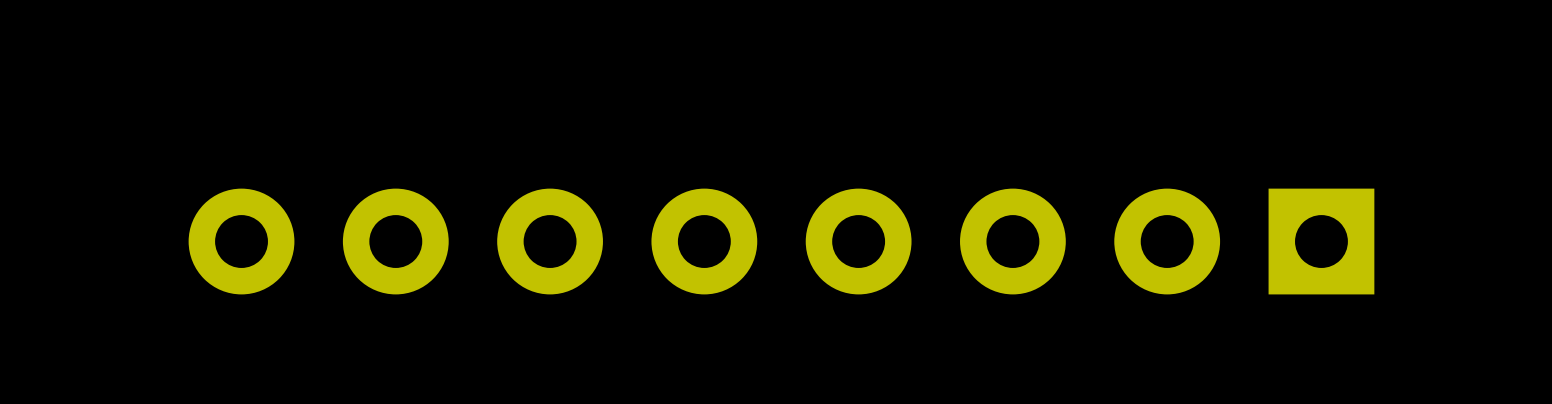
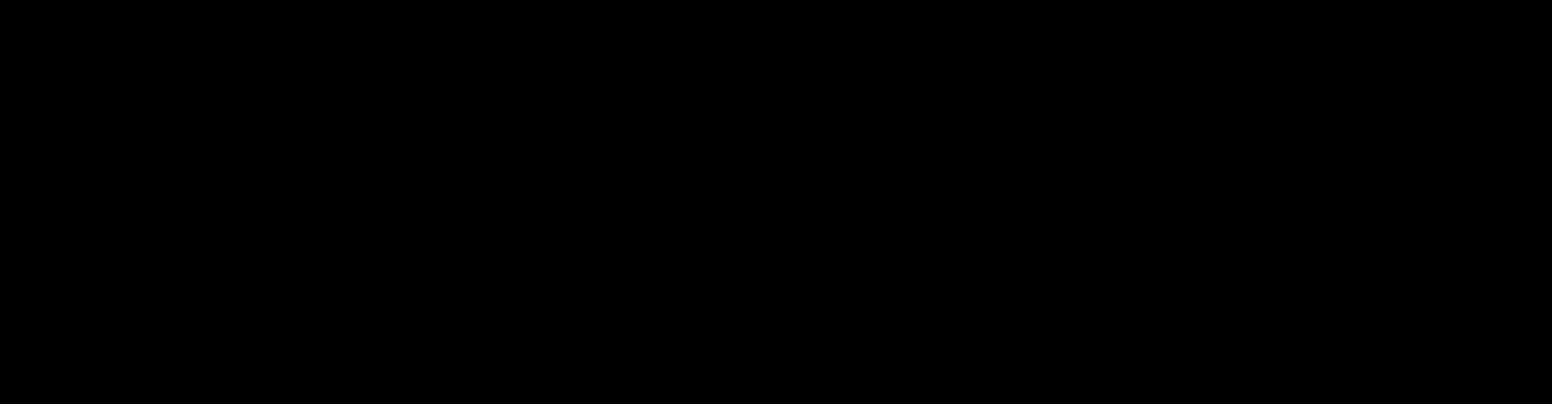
part: (781, 241) -> none

